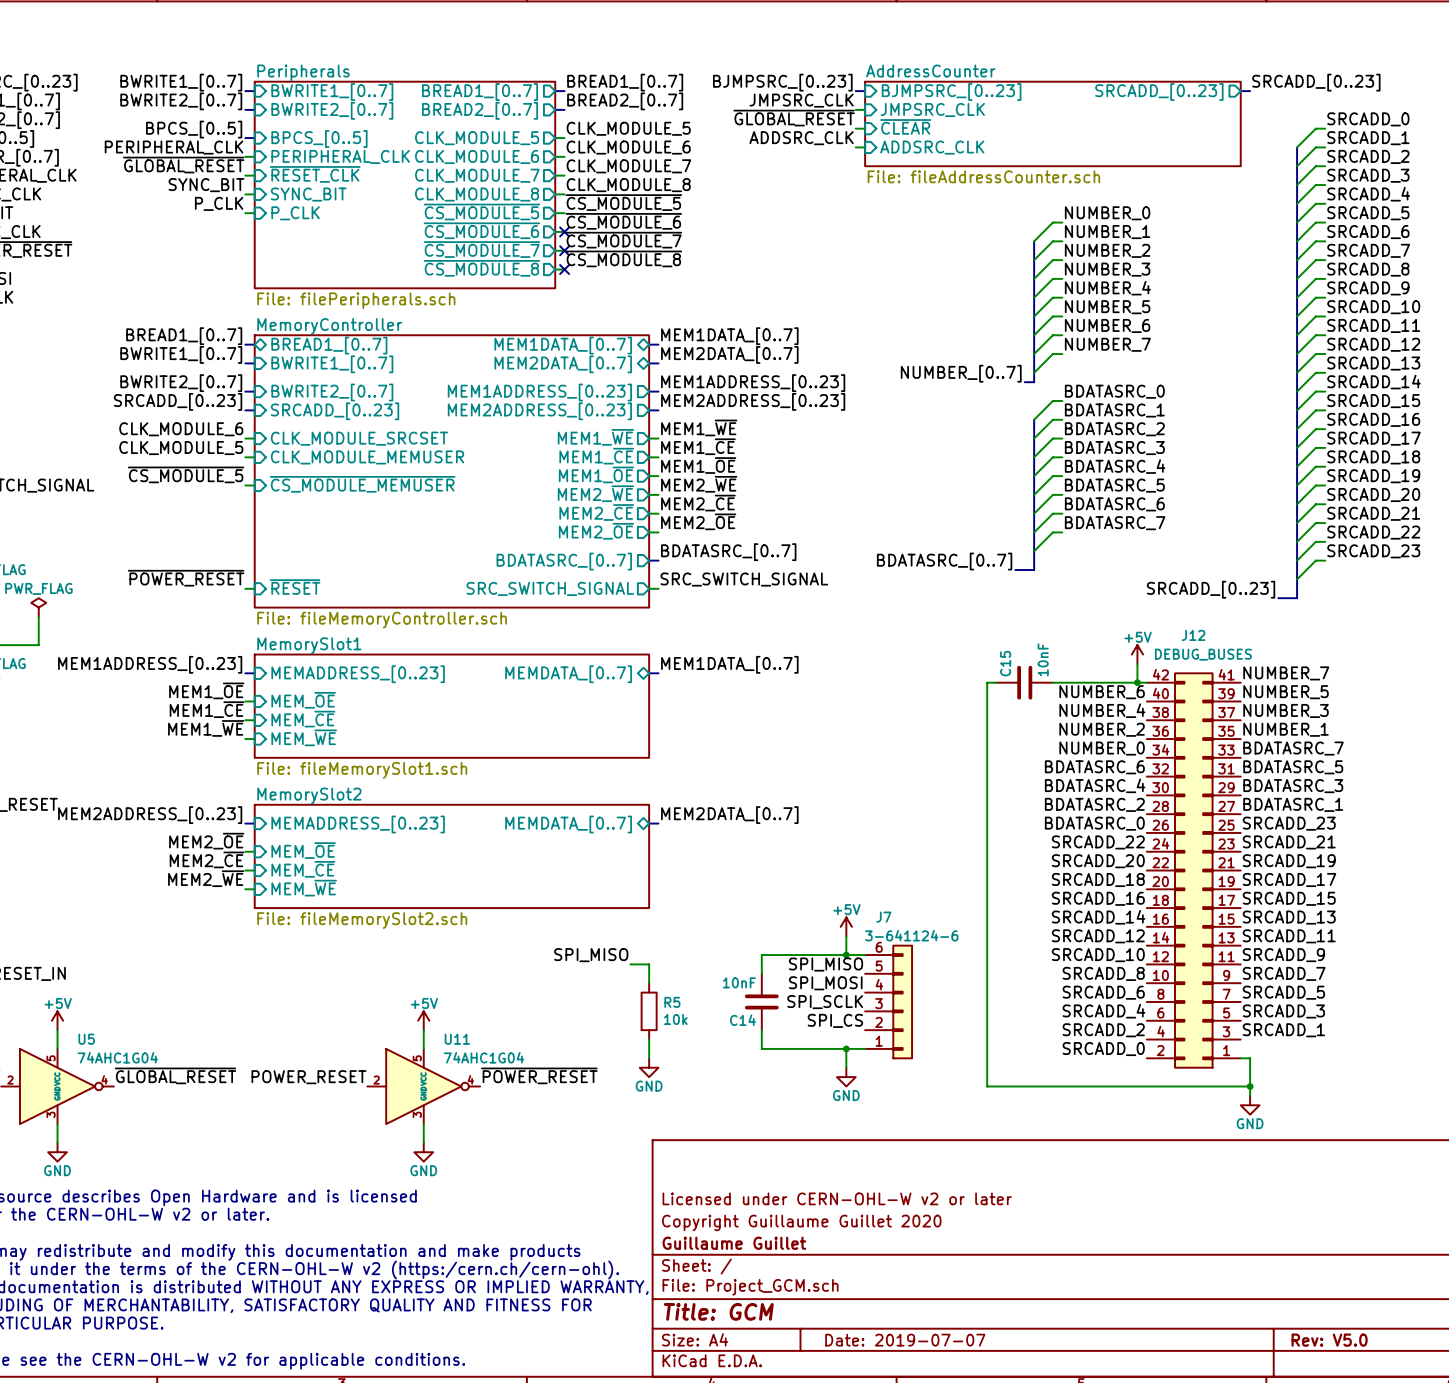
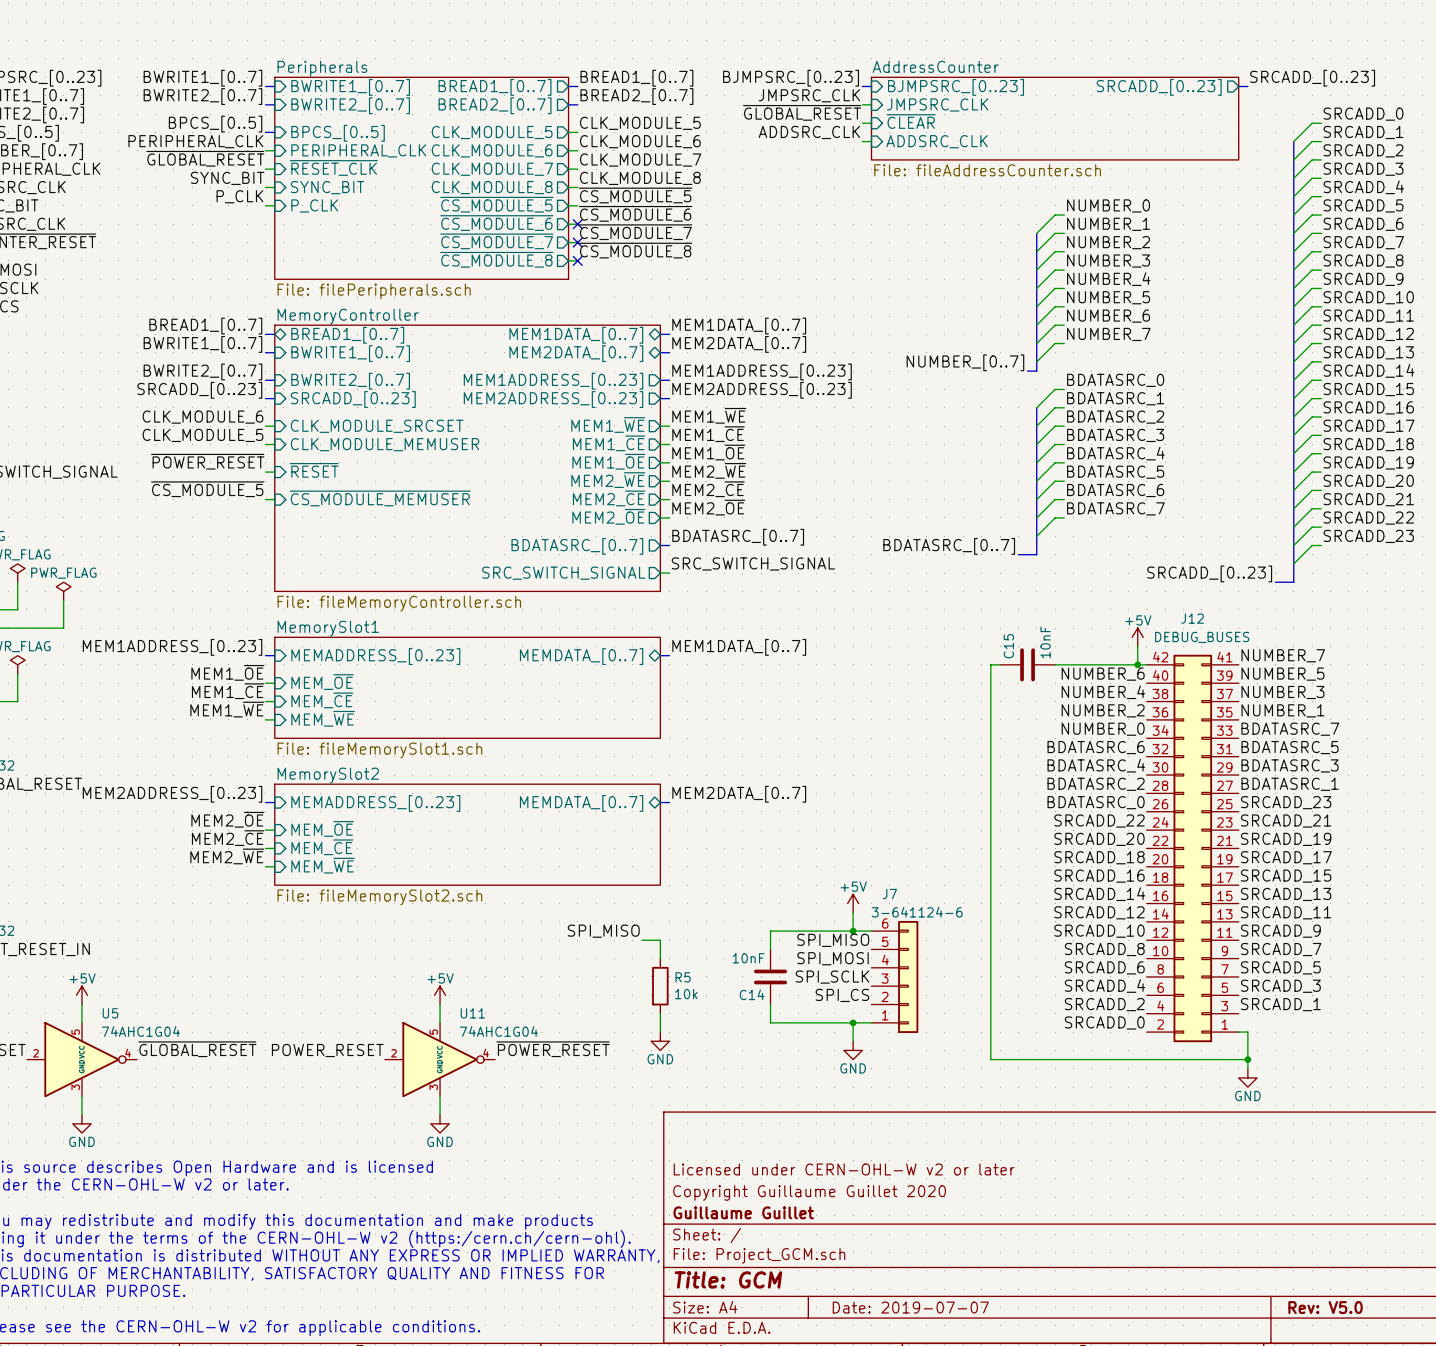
label: ~{CS_MODULE_5} (186, 474) -> ~{POWER_RESET} (207, 461)
sheet pin: ~{CS_MODULE_MEMUSER} (362, 484) -> ~{RESET} (314, 470)
label: none -> ~{CS_MODULE_5} (207, 489)
sheet pin: none -> ~{CS_MODULE_MEMUSER} (380, 498)
label: ~{POWER_RESET} (186, 578) -> none
sheet pin: ~{RESET} (295, 587) -> none
wire: (245, 588) (254, 588) -> (265, 499) (274, 499)

